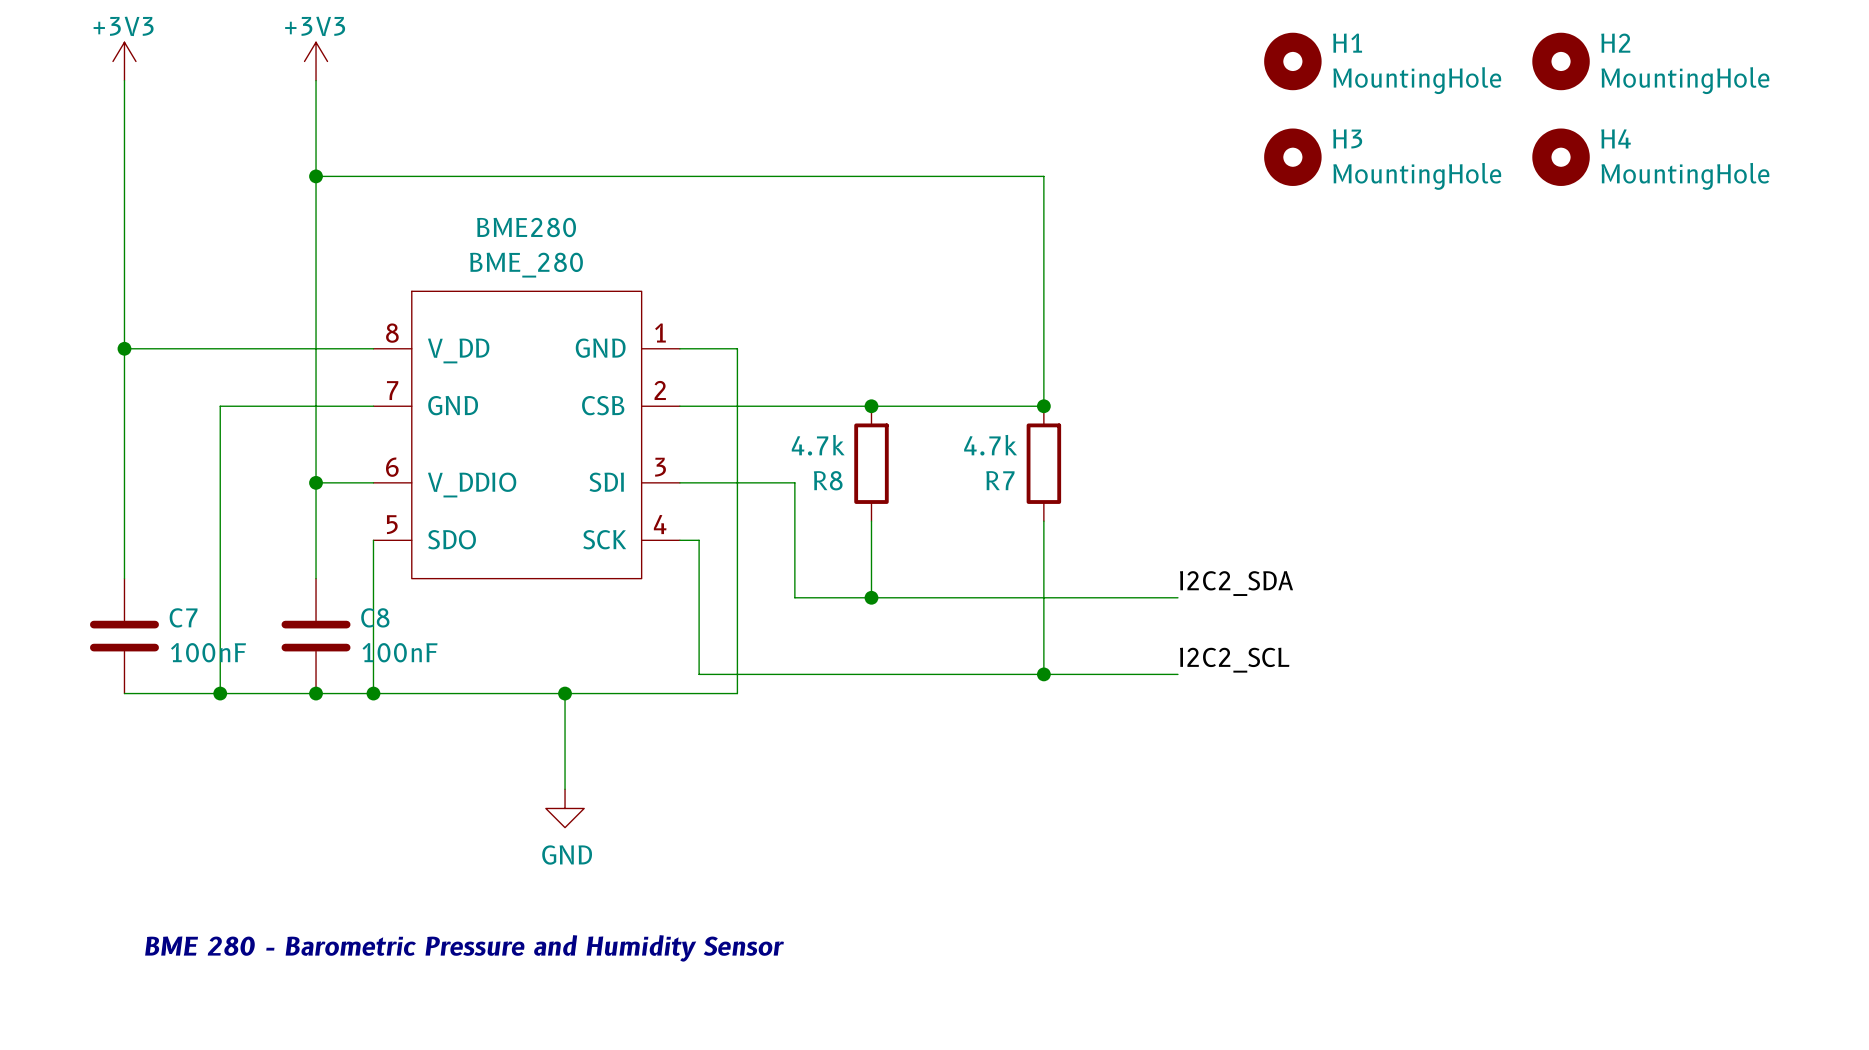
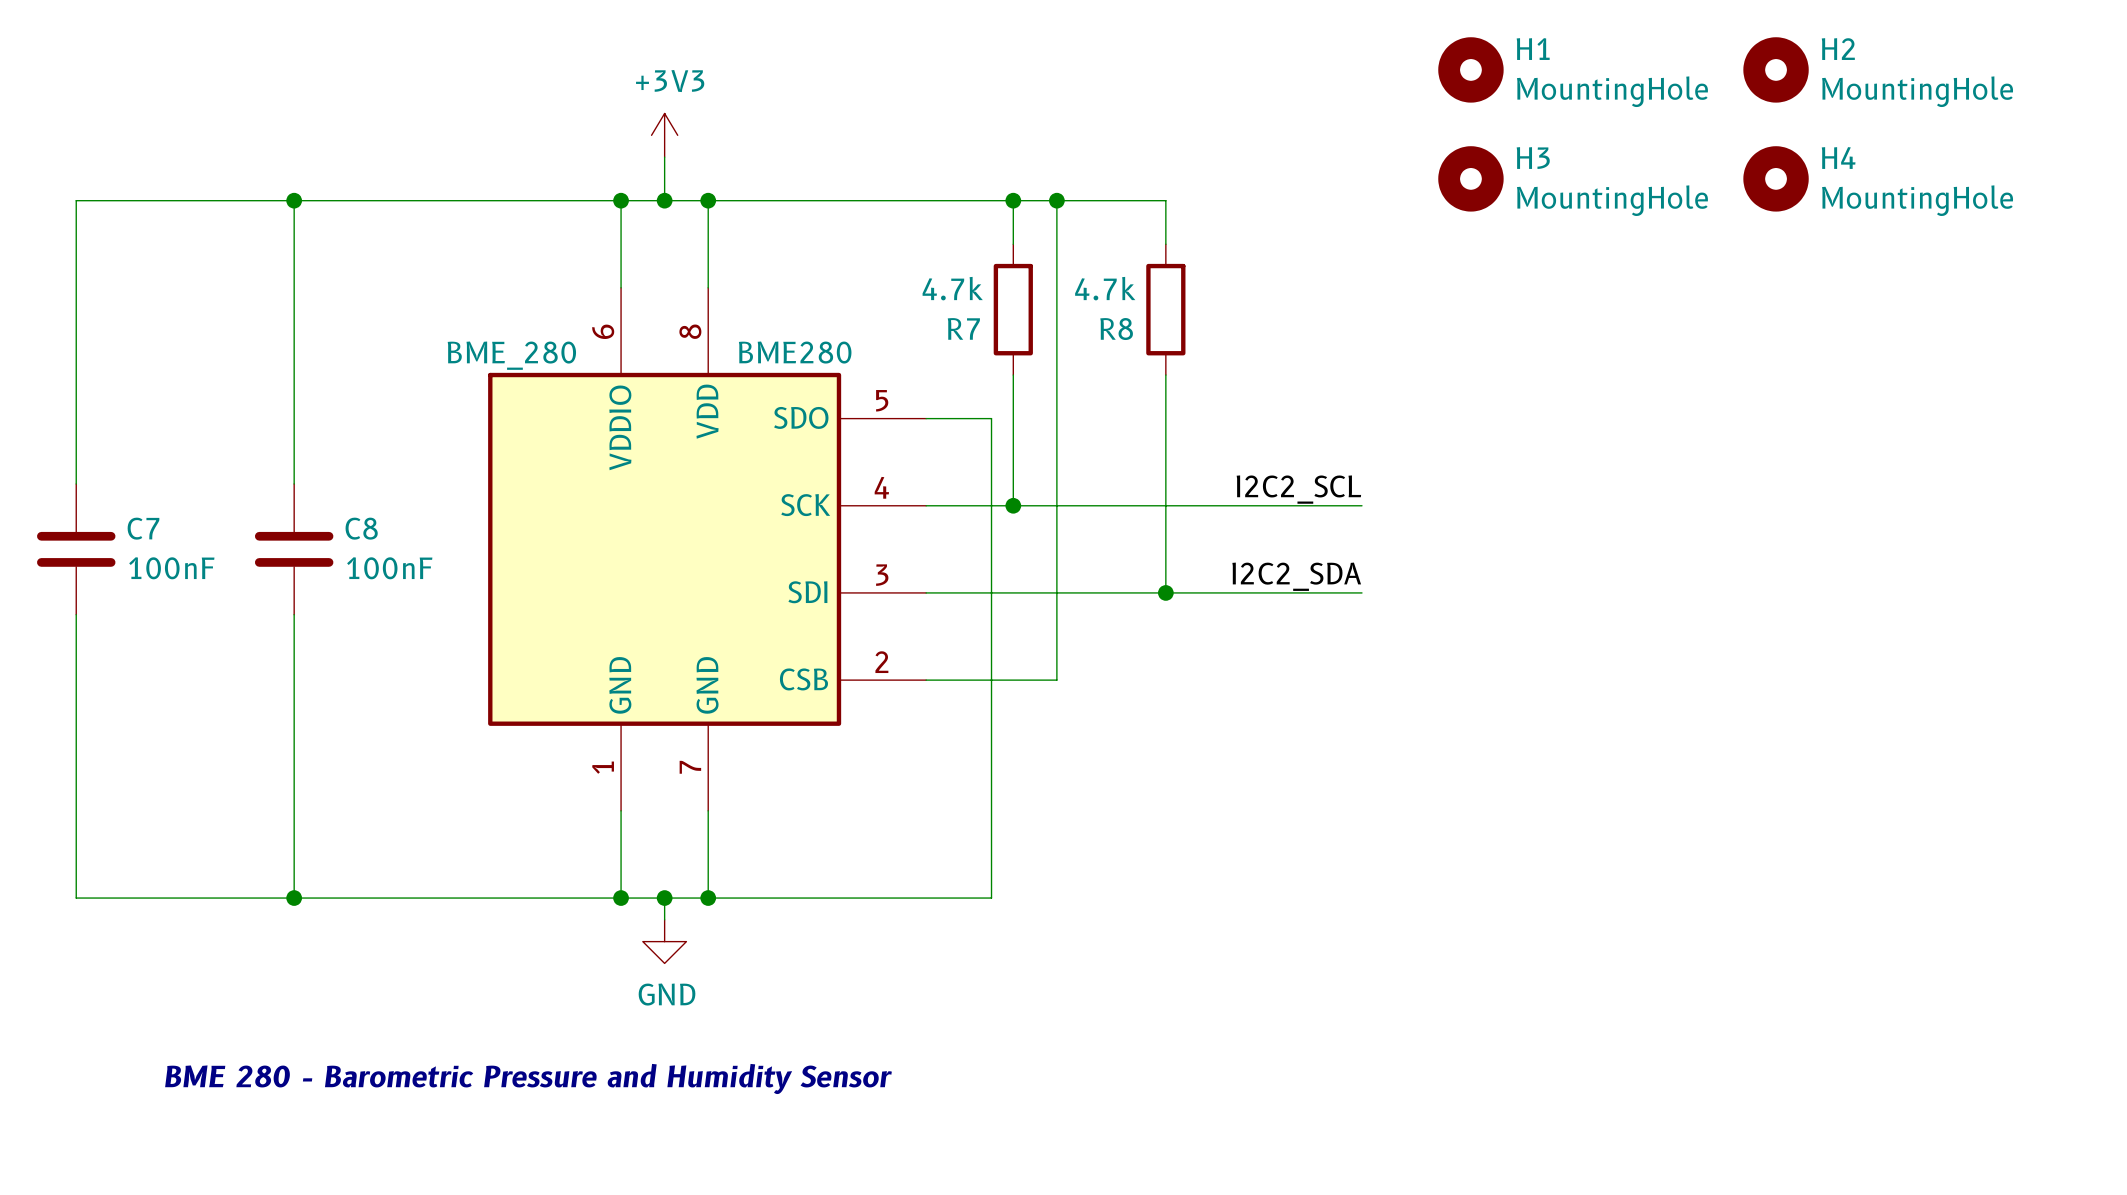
power symbol: +3V3 (124, 61) -> none
power symbol: +3V3 (316, 61) -> none
wire: (124, 80) (124, 578) -> none
wire: (316, 80) (316, 578) -> none
power symbol: none -> +3V3 (664, 135)
wire: none -> (664, 157) (664, 200)
wire: none -> (294, 200) (294, 483)
wire: none -> (359, 200) (76, 200) (76, 483)
junction position: (316, 176) -> (294, 200)
wire: none -> (621, 200) (621, 287)
junction: none -> (621, 200)
junction: none -> (664, 200)
wire: none -> (708, 200) (708, 287)
junction: none -> (708, 200)
wire: none -> (1013, 200) (1013, 244)
junction: none -> (1013, 200)
junction: none -> (1056, 200)
wire: (1024, 176) (1043, 176) (1043, 406) (679, 406) -> (1165, 200) (1165, 244)
BME280 name position: BME280 (526, 227) -> BME280 (795, 352)
BME280 value position: BME_280 (526, 265) -> BME_280 (511, 355)
BME280 symbol: [373, 291, 680, 579] -> [488, 287, 927, 811]
wire: none -> (1013, 375) (1013, 505)
wire: none -> (1165, 375) (1165, 592)
wire: (124, 348) (373, 348) -> none
junction: (124, 348) -> none
wire: (679, 348) (737, 348) (737, 693) (124, 693) -> none
wire: none -> (926, 418) (991, 418) (991, 592)
wire: (373, 406) (220, 406) (220, 693) -> none
junction position: (871, 406) -> (1013, 505)
junction: (1043, 406) -> none
wire: none -> (926, 505) (1361, 505)
R8 position: (871, 463) -> (1165, 309)
R7 position: (1043, 463) -> (1013, 309)
wire: (316, 482) (373, 482) -> none
junction: (316, 482) -> none
wire: (679, 482) (794, 482) (794, 597) (814, 597) -> none
wire: none -> (926, 592) (1361, 592)
junction: none -> (1165, 592)
wire: (1043, 521) (1043, 674) -> none
wire: none -> (76, 614) (76, 898) (991, 898) (991, 680)
wire: none -> (294, 614) (294, 898)
wire: (373, 540) (373, 693) -> none
wire: (679, 540) (699, 540) (699, 674) (1177, 674) -> none
label position: I2C2_SDA (1236, 583) -> I2C2_SDA (1296, 576)
junction: (871, 597) -> none
wire: (928, 597) (1177, 597) -> (1056, 680) (1056, 200)
C7 position: (124, 636) -> (76, 549)
C8 position: (316, 636) -> (294, 549)
label position: I2C2_SCL (1234, 660) -> I2C2_SCL (1298, 489)
junction: (1043, 674) -> none
junction: (220, 693) -> none
junction: (316, 693) -> none
junction: (373, 693) -> none
wire: (565, 693) (565, 789) -> none
junction: (565, 693) -> none
wire: none -> (621, 810) (621, 898)
wire: none -> (708, 810) (708, 898)
junction: none -> (294, 898)
junction: none -> (621, 898)
wire: none -> (664, 898) (664, 919)
junction: none -> (664, 898)
junction: none -> (708, 898)
power symbol position: GND (565, 808) -> GND (664, 941)

